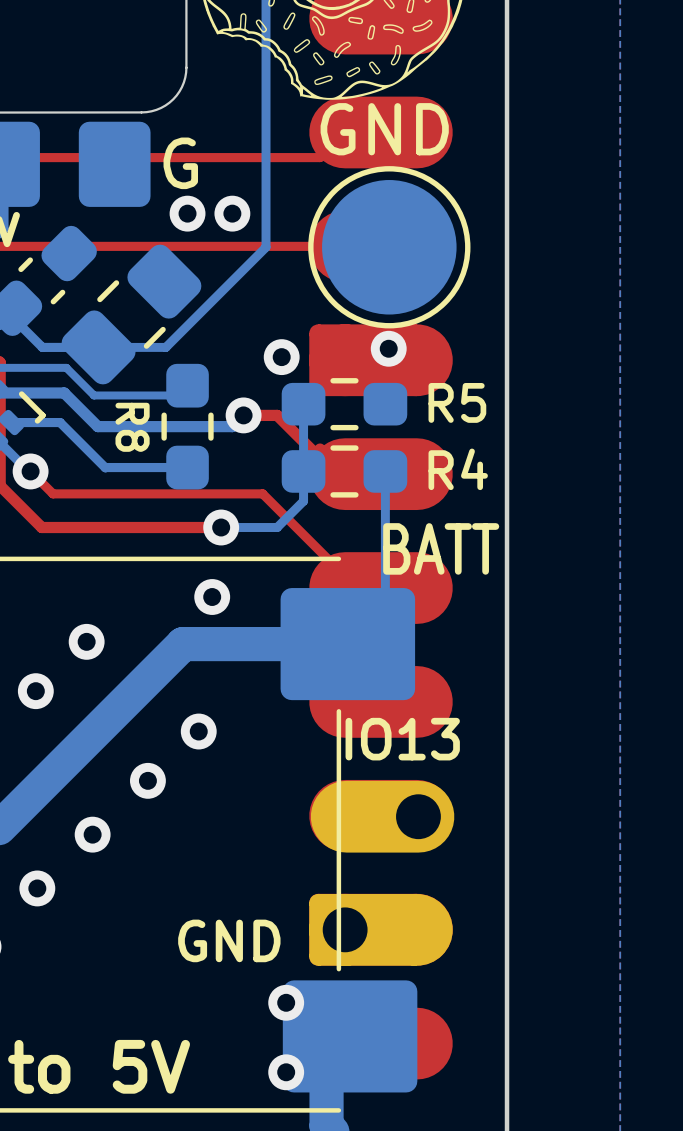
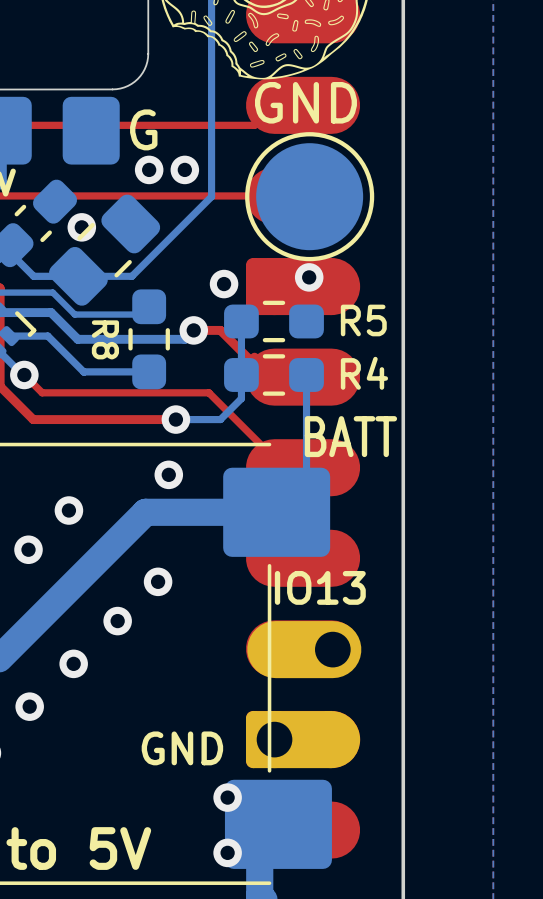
via: none -> (81, 227)

